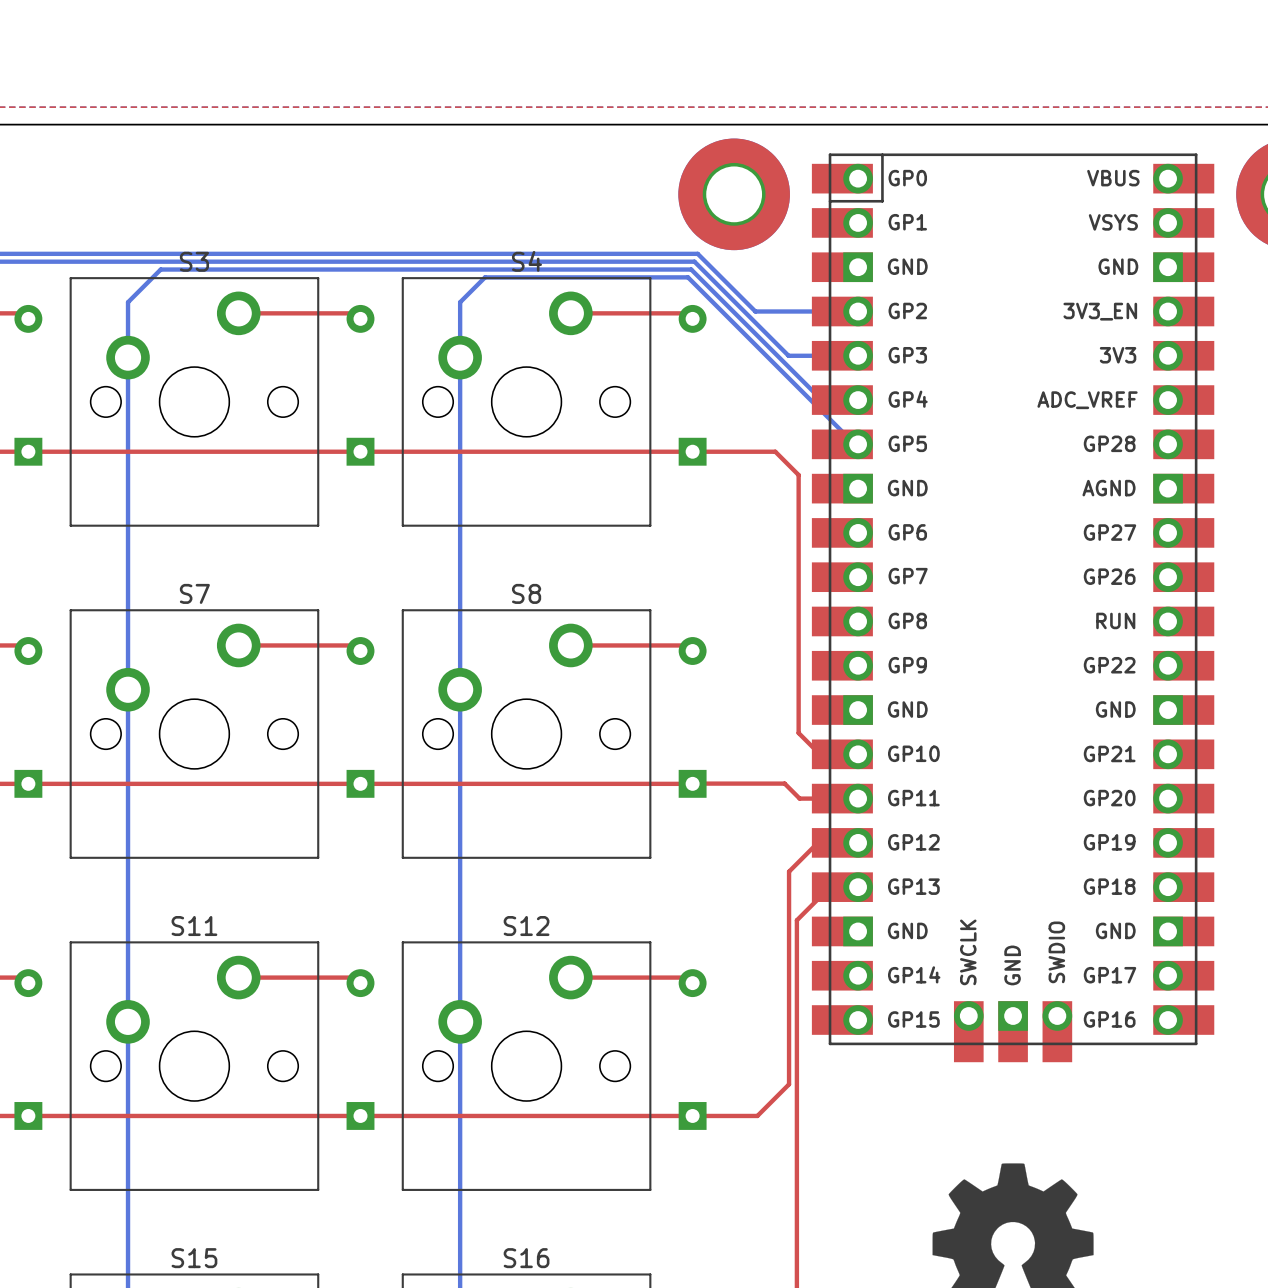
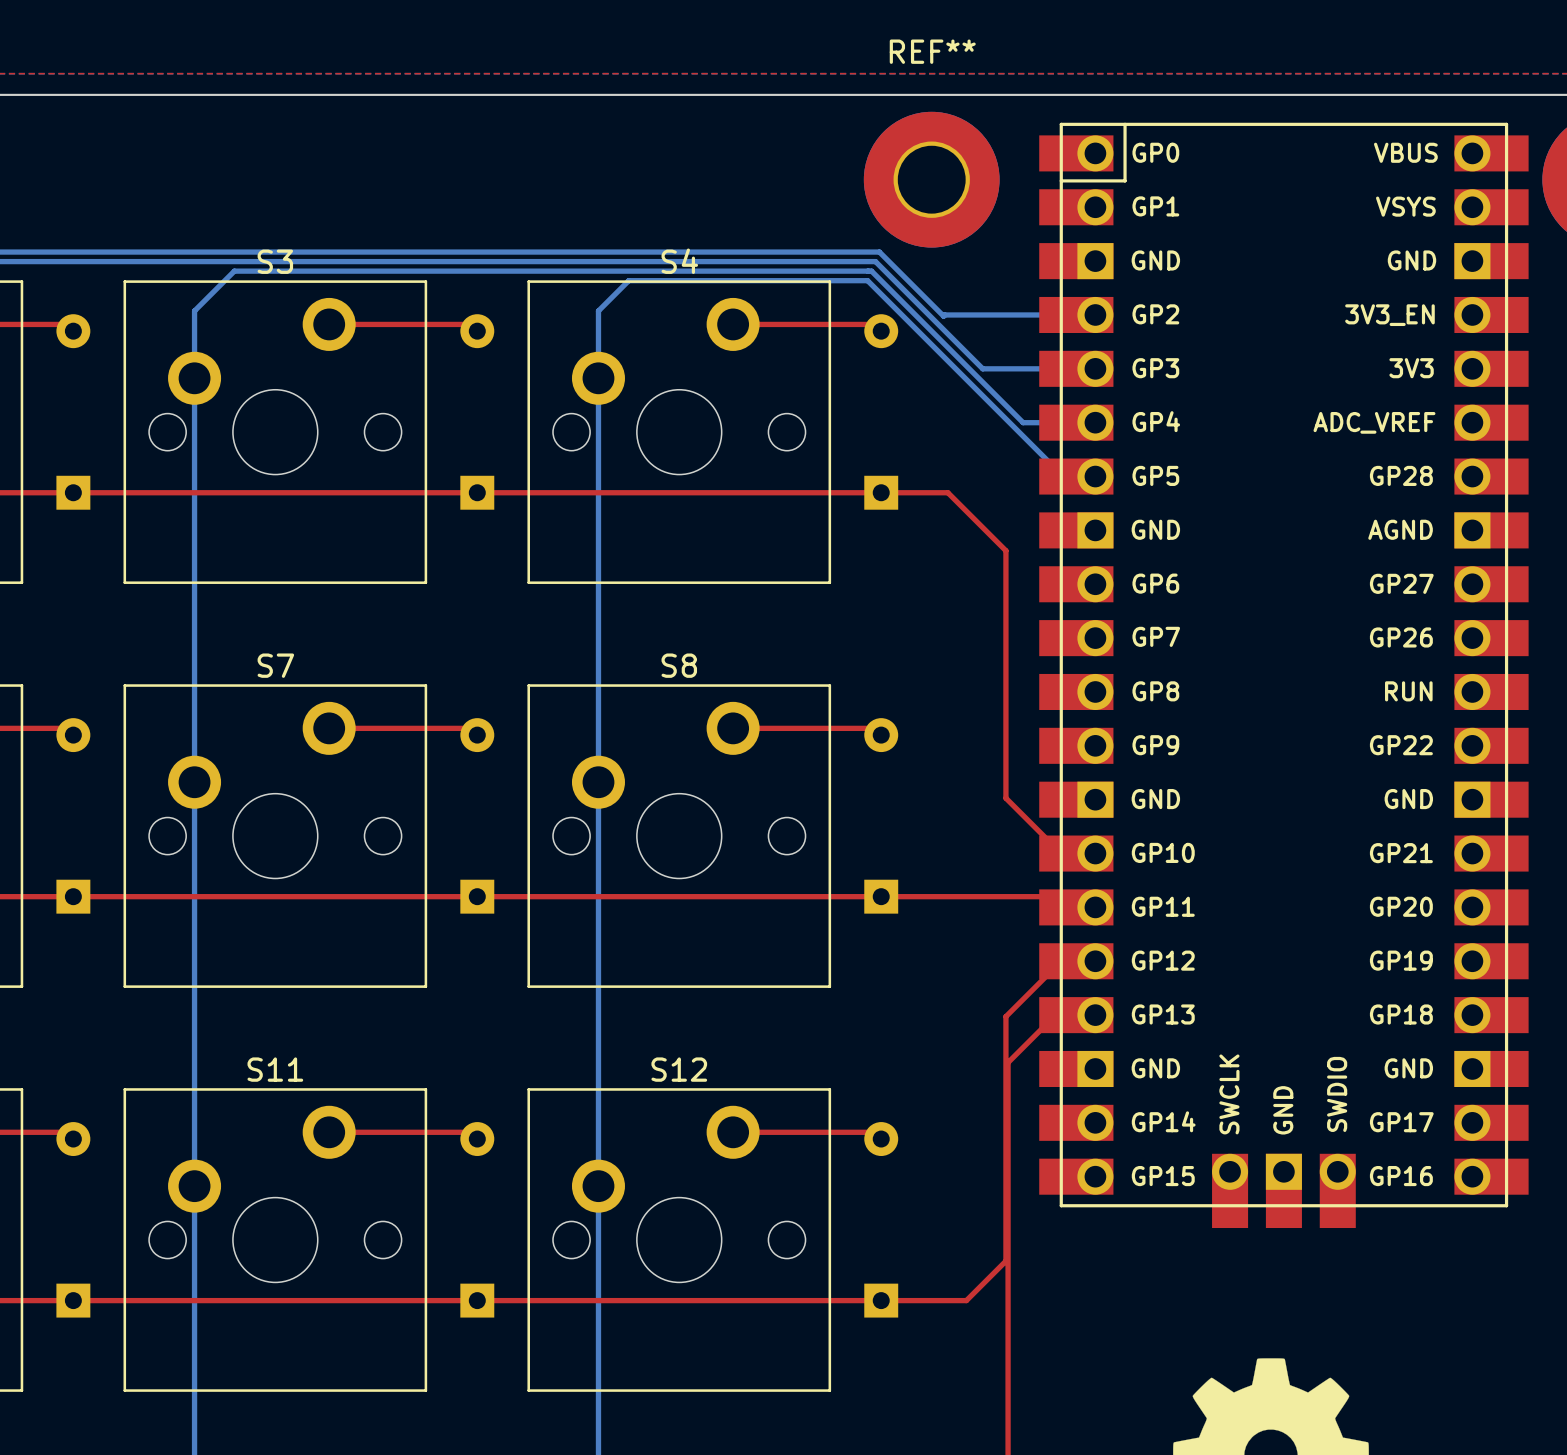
REF** name: none -> REF** (932, 51)
bottom track: (691, 253) (697, 253) (755, 311) (858, 311) -> (879, 252) (943, 316) (1095, 314)
bottom track: (687, 261) (694, 261) (788, 355) (858, 355) -> (875, 261) (982, 368) (1095, 368)
bottom track: (684, 269) (691, 269) (821, 400) (858, 400) -> (871, 271) (1023, 422) (1095, 422)
bottom track: (681, 277) (687, 277) (854, 444) (858, 444) -> (867, 280) (1063, 476) (1095, 476)
top track: (747, 451) (775, 451) (798, 475) (798, 733) (819, 754) (858, 754) -> (947, 492) (1005, 550) (1005, 798) (1061, 853) (1095, 853)
part position: (1013, 607) -> (1283, 675)
top track: (692, 783) (784, 783) (799, 798) (858, 798) -> (881, 896) (1084, 896) (1095, 907)
top track: (858, 842) (817, 842) (789, 871) (789, 1084) (757, 1115) -> (1095, 961) (1061, 961) (1005, 1016) (1005, 1261) (966, 1300) (960, 1300)

